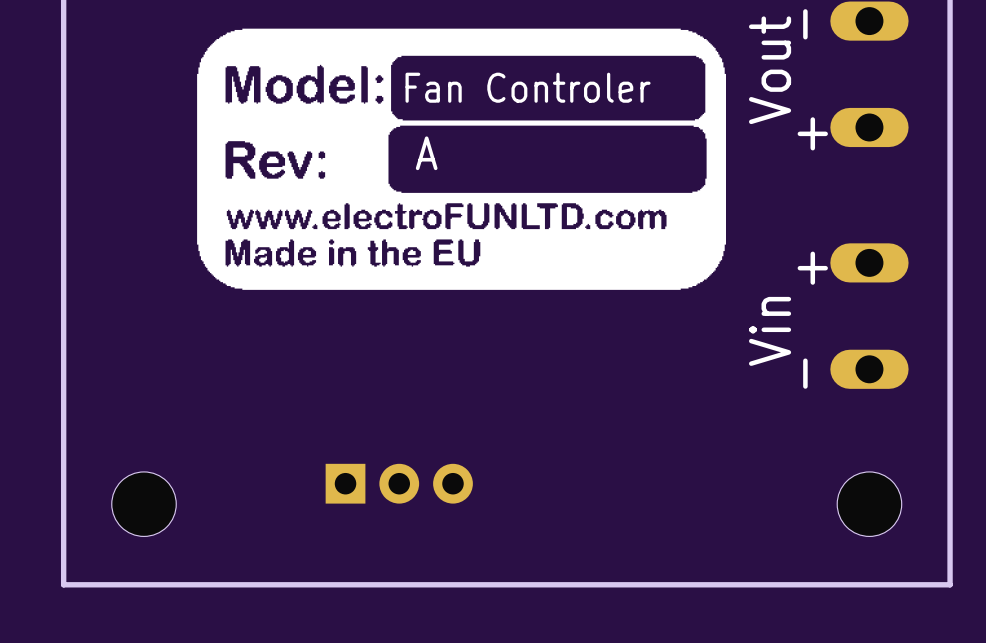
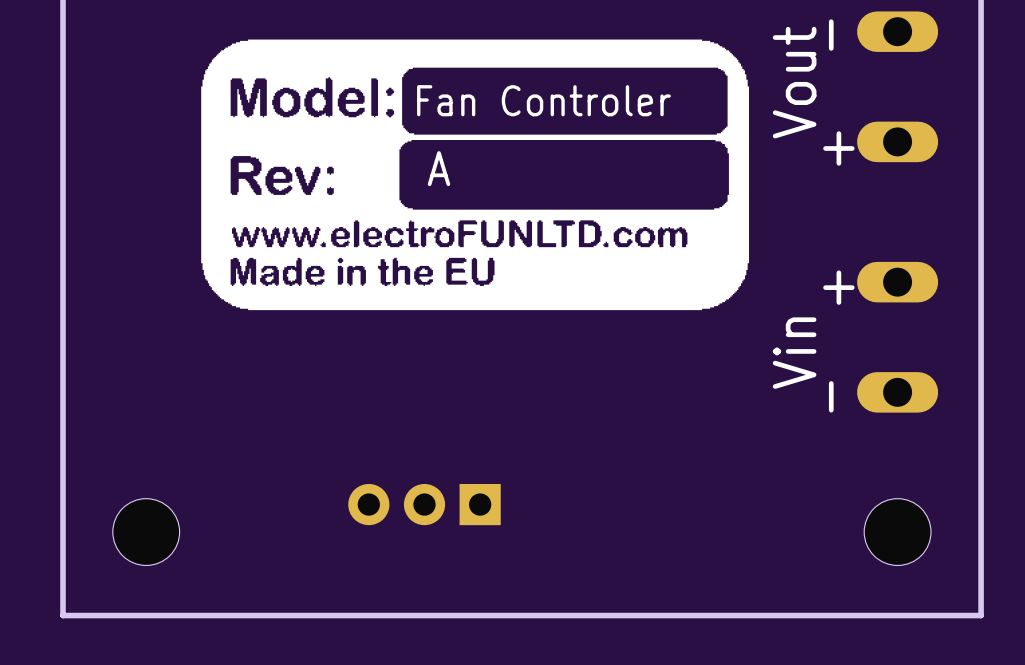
part rotation: 0° (399, 483) -> 180° (424, 504)

